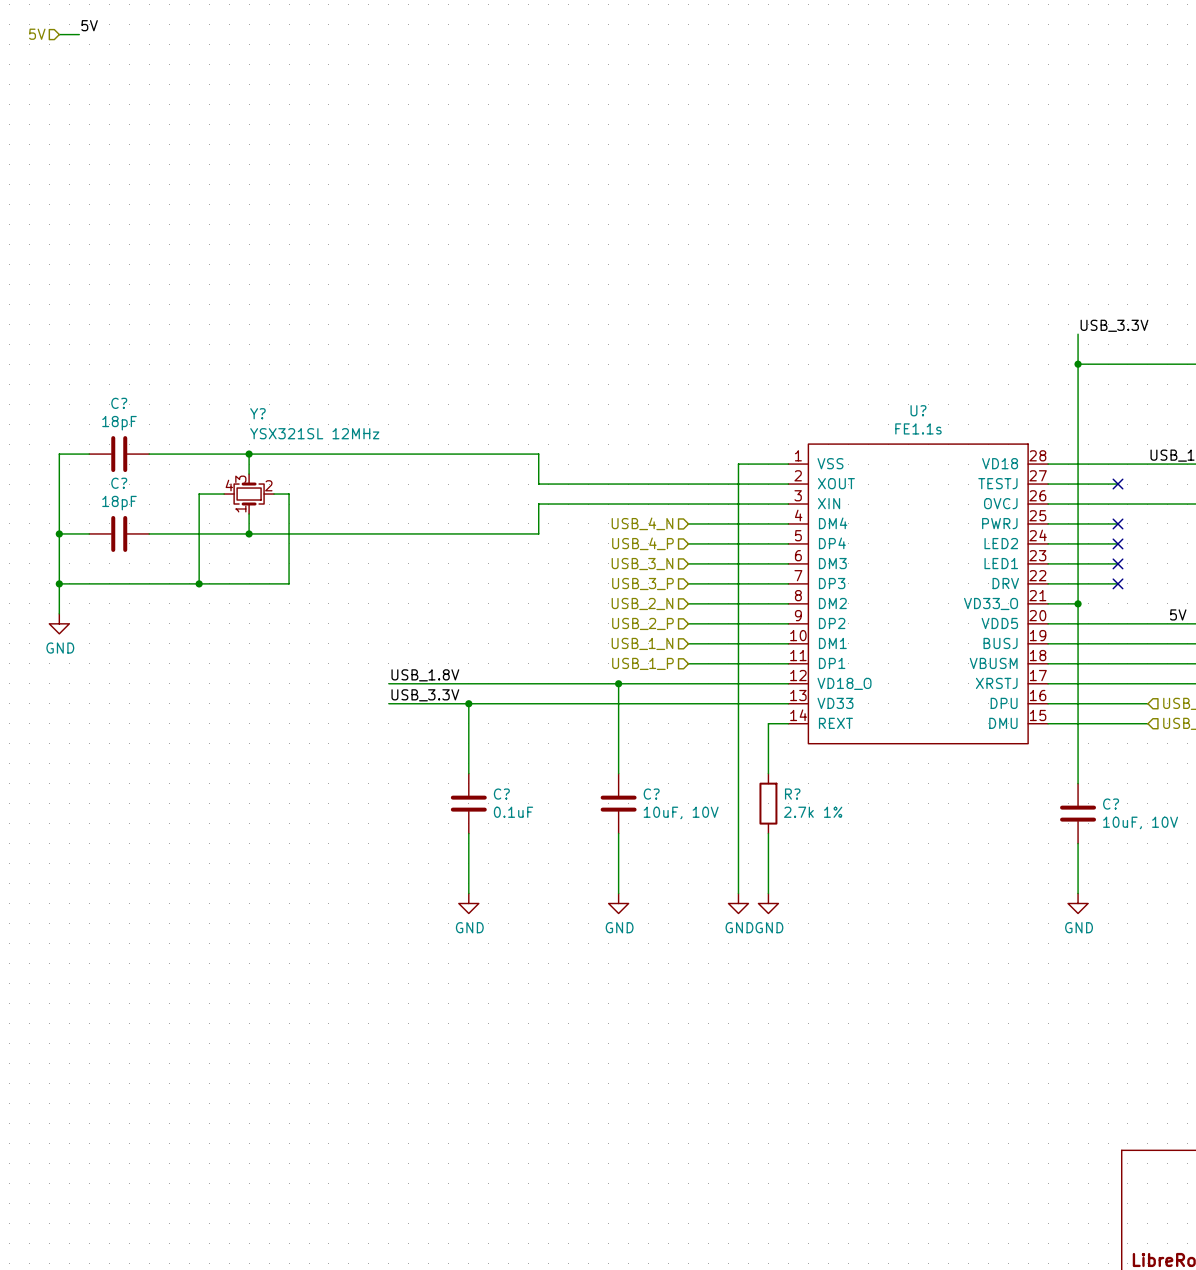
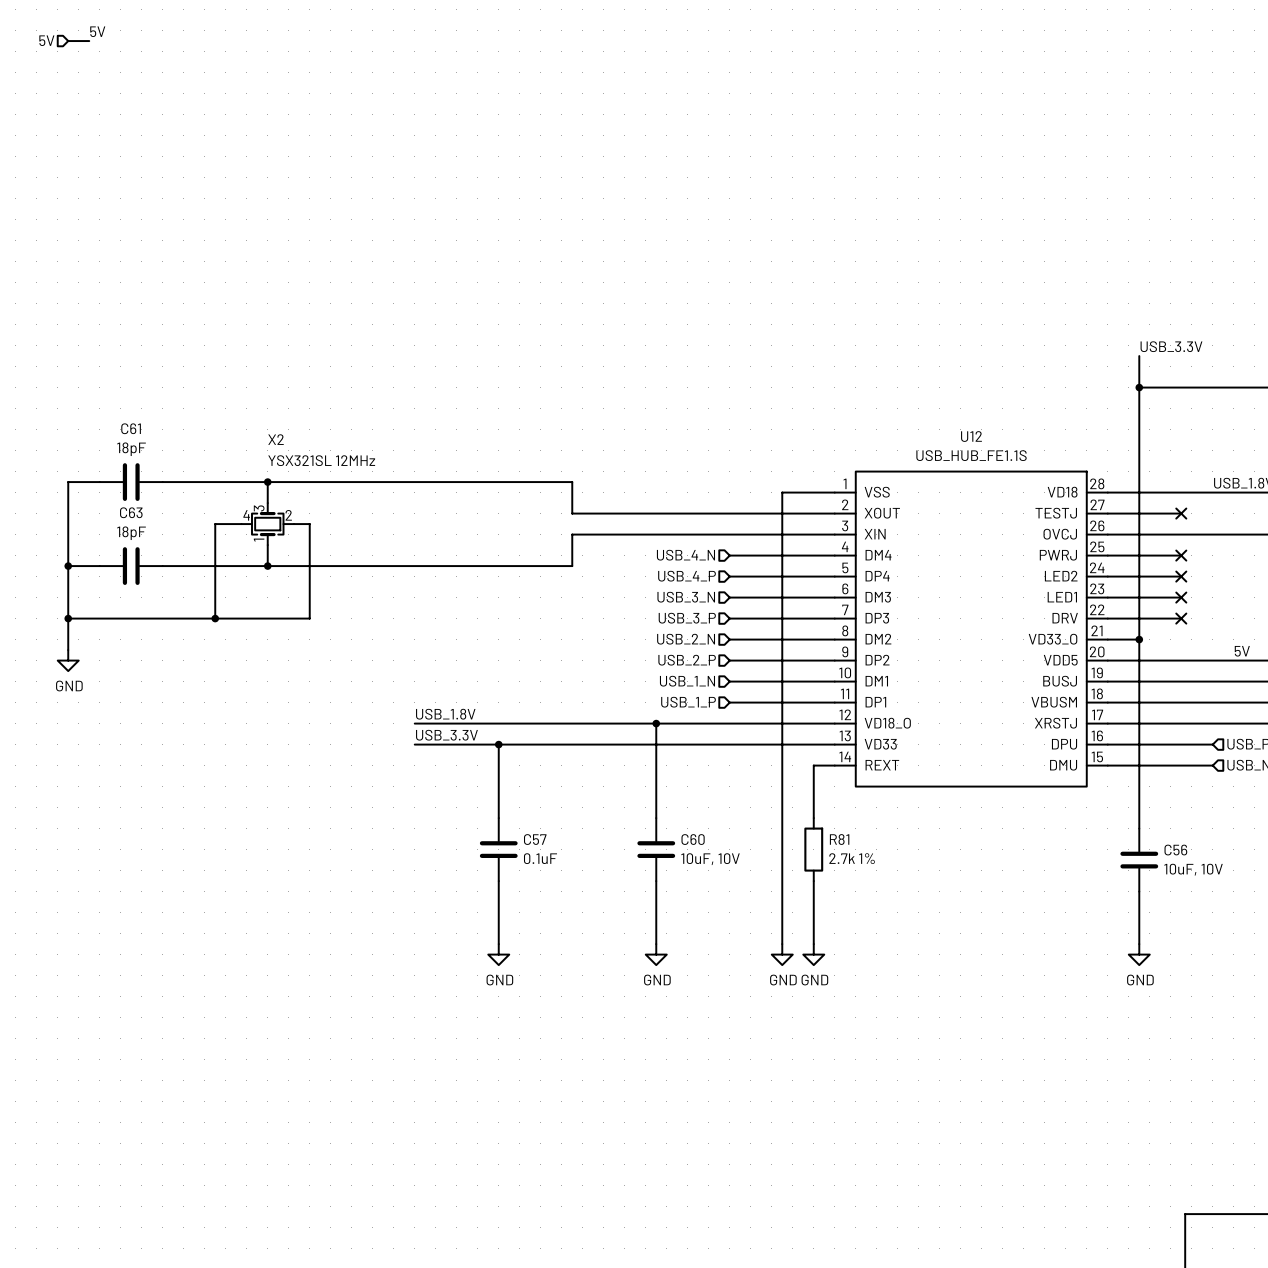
C? name: C? (119, 403) -> C61 (131, 428)
U? name: U? (918, 410) -> U12 (971, 436)
Y? name: Y? (257, 413) -> X2 (276, 439)
U? value: FE1.1s (918, 428) -> USB_HUB_FE1.1S (971, 455)
C? name: C? (119, 483) -> C63 (131, 512)
C? name: C? (501, 794) -> C57 (535, 839)
C? name: C? (651, 794) -> C60 (693, 839)
R? name: R? (792, 794) -> R81 (839, 839)
C? name: C? (1111, 804) -> C56 (1175, 850)

